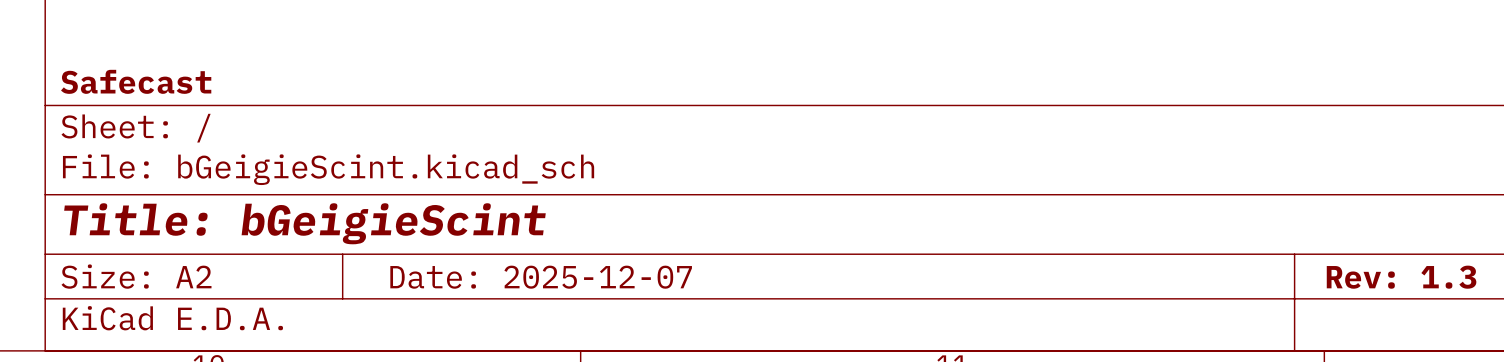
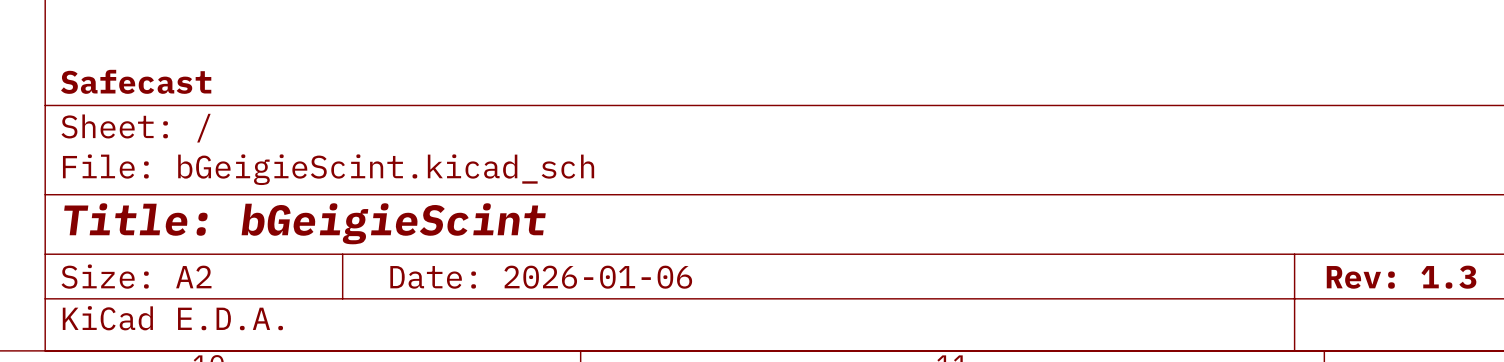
title block: Date: 2025-12-07 (541, 277) -> Date: 2026-01-06 (541, 277)

